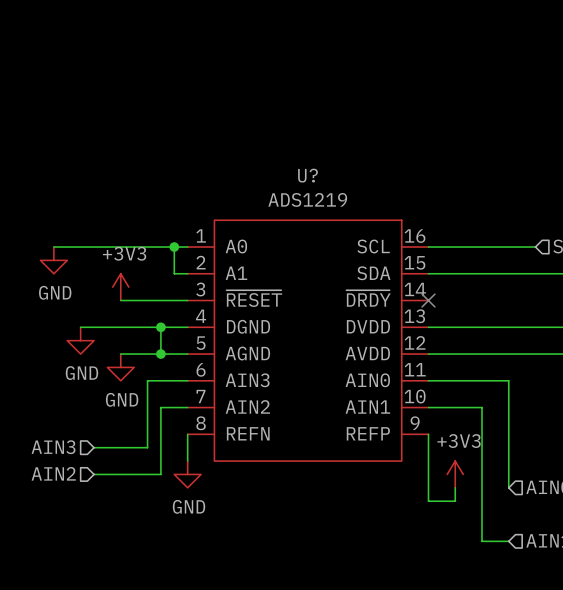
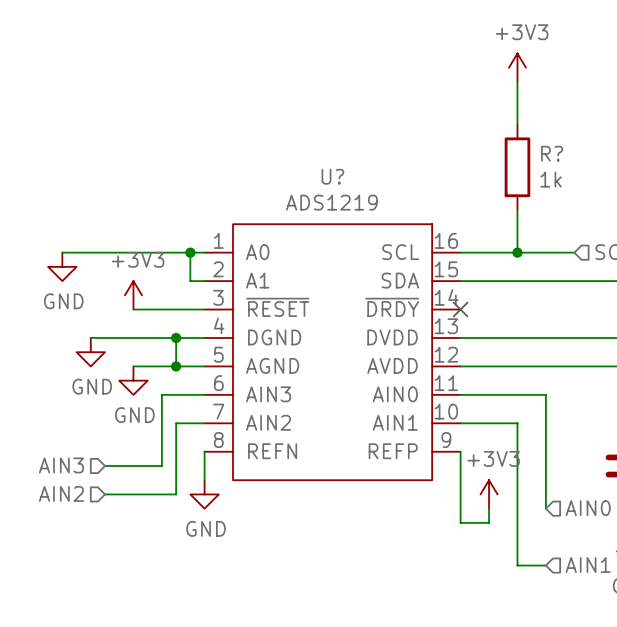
power symbol: none -> +3V3 (517, 67)
wire: none -> (517, 81) (517, 124)
R?: none -> 1k (517, 167)
wire: none -> (517, 209) (517, 252)
junction: none -> (517, 252)

